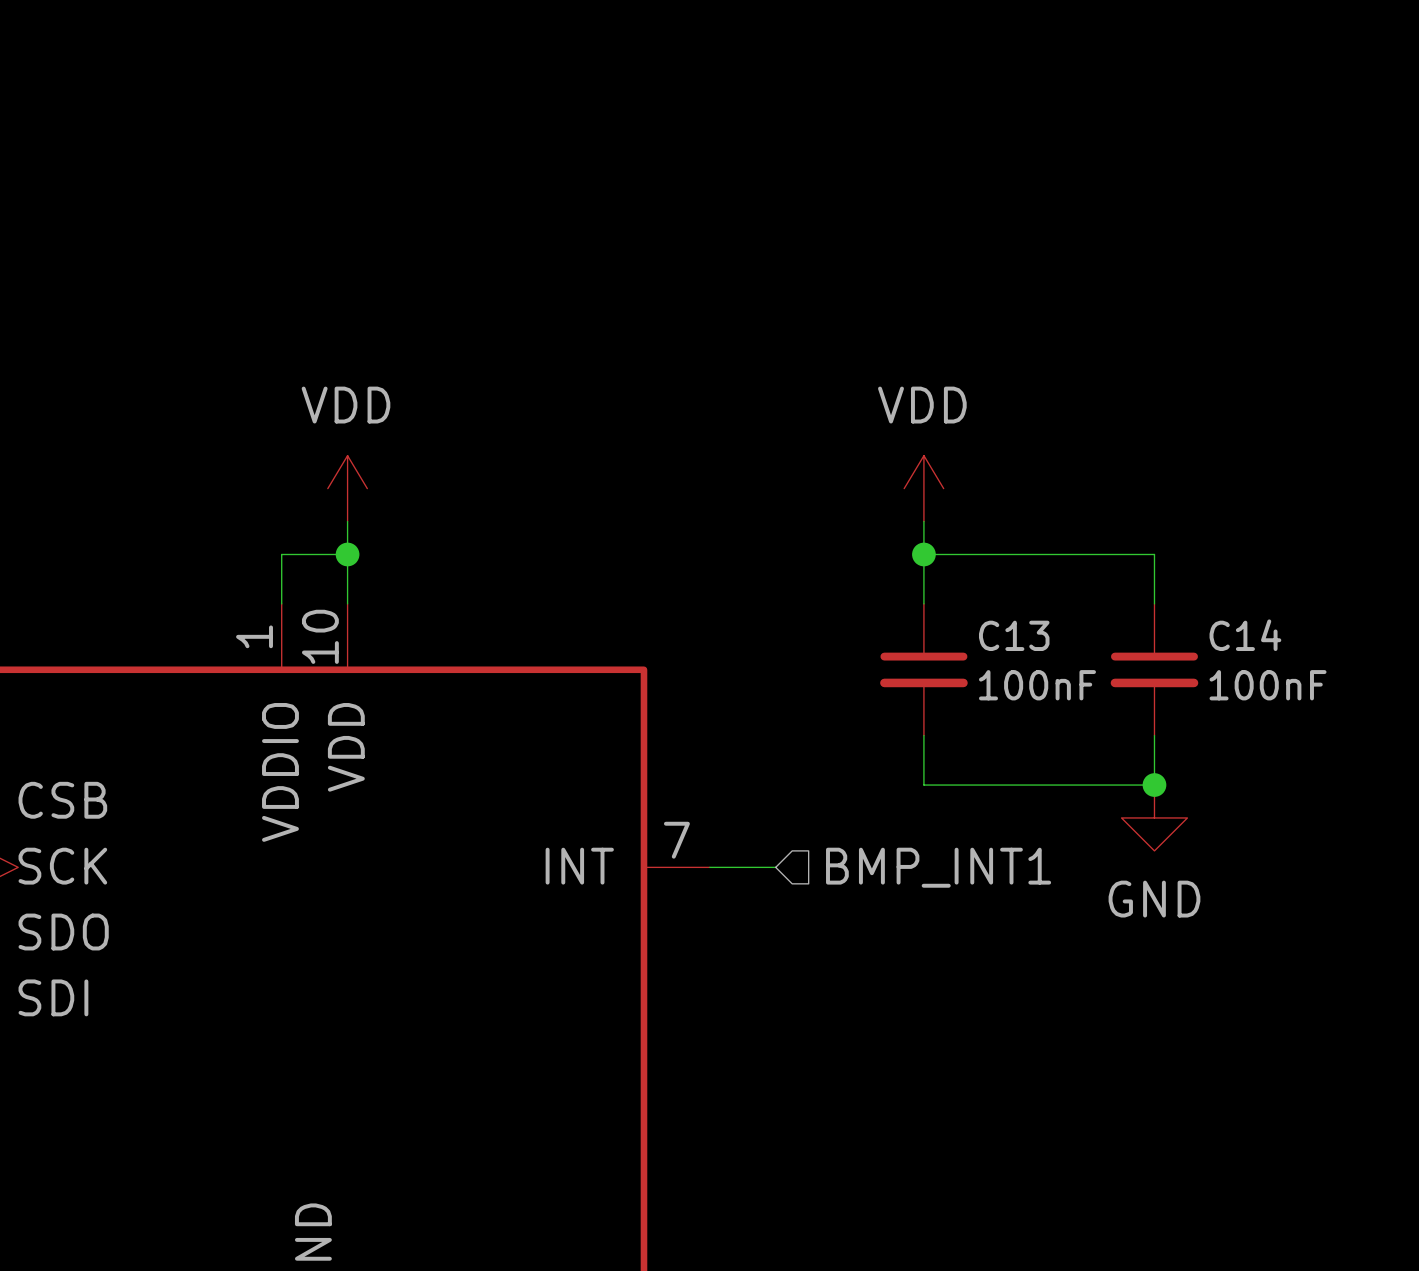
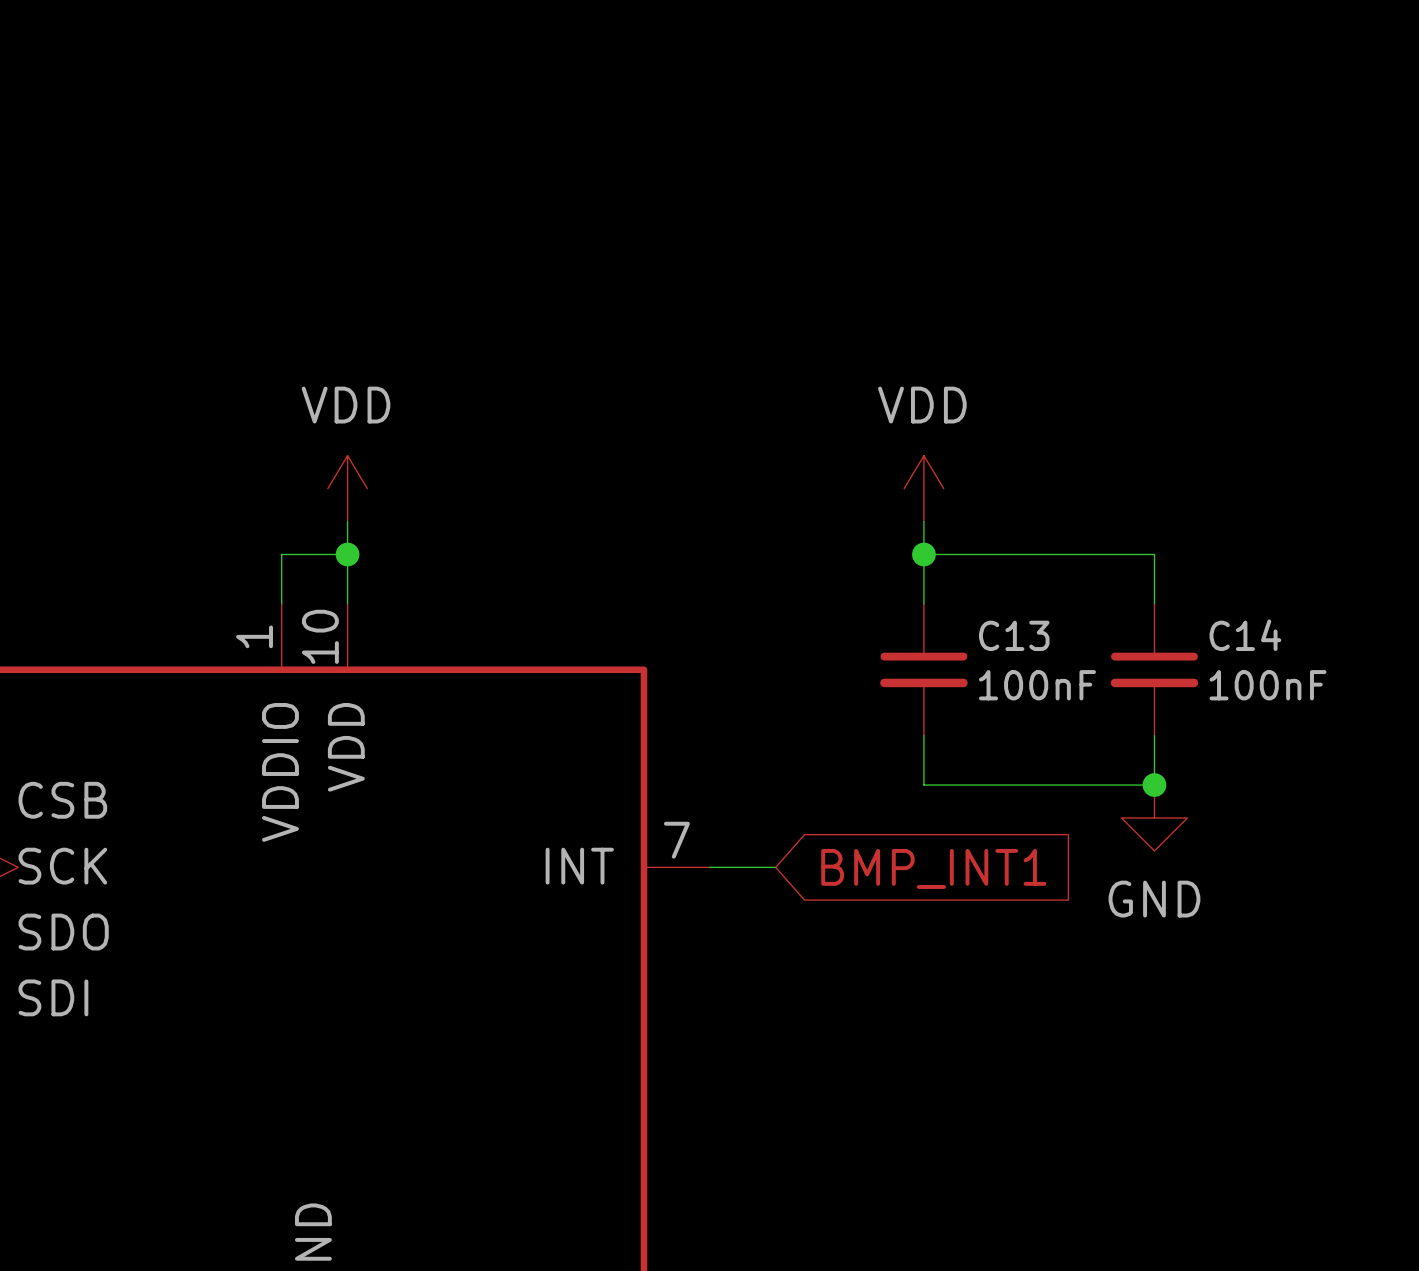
hierarchical label: BMP_INT1 (938, 867) -> none
global label: none -> BMP_INT1 (933, 868)

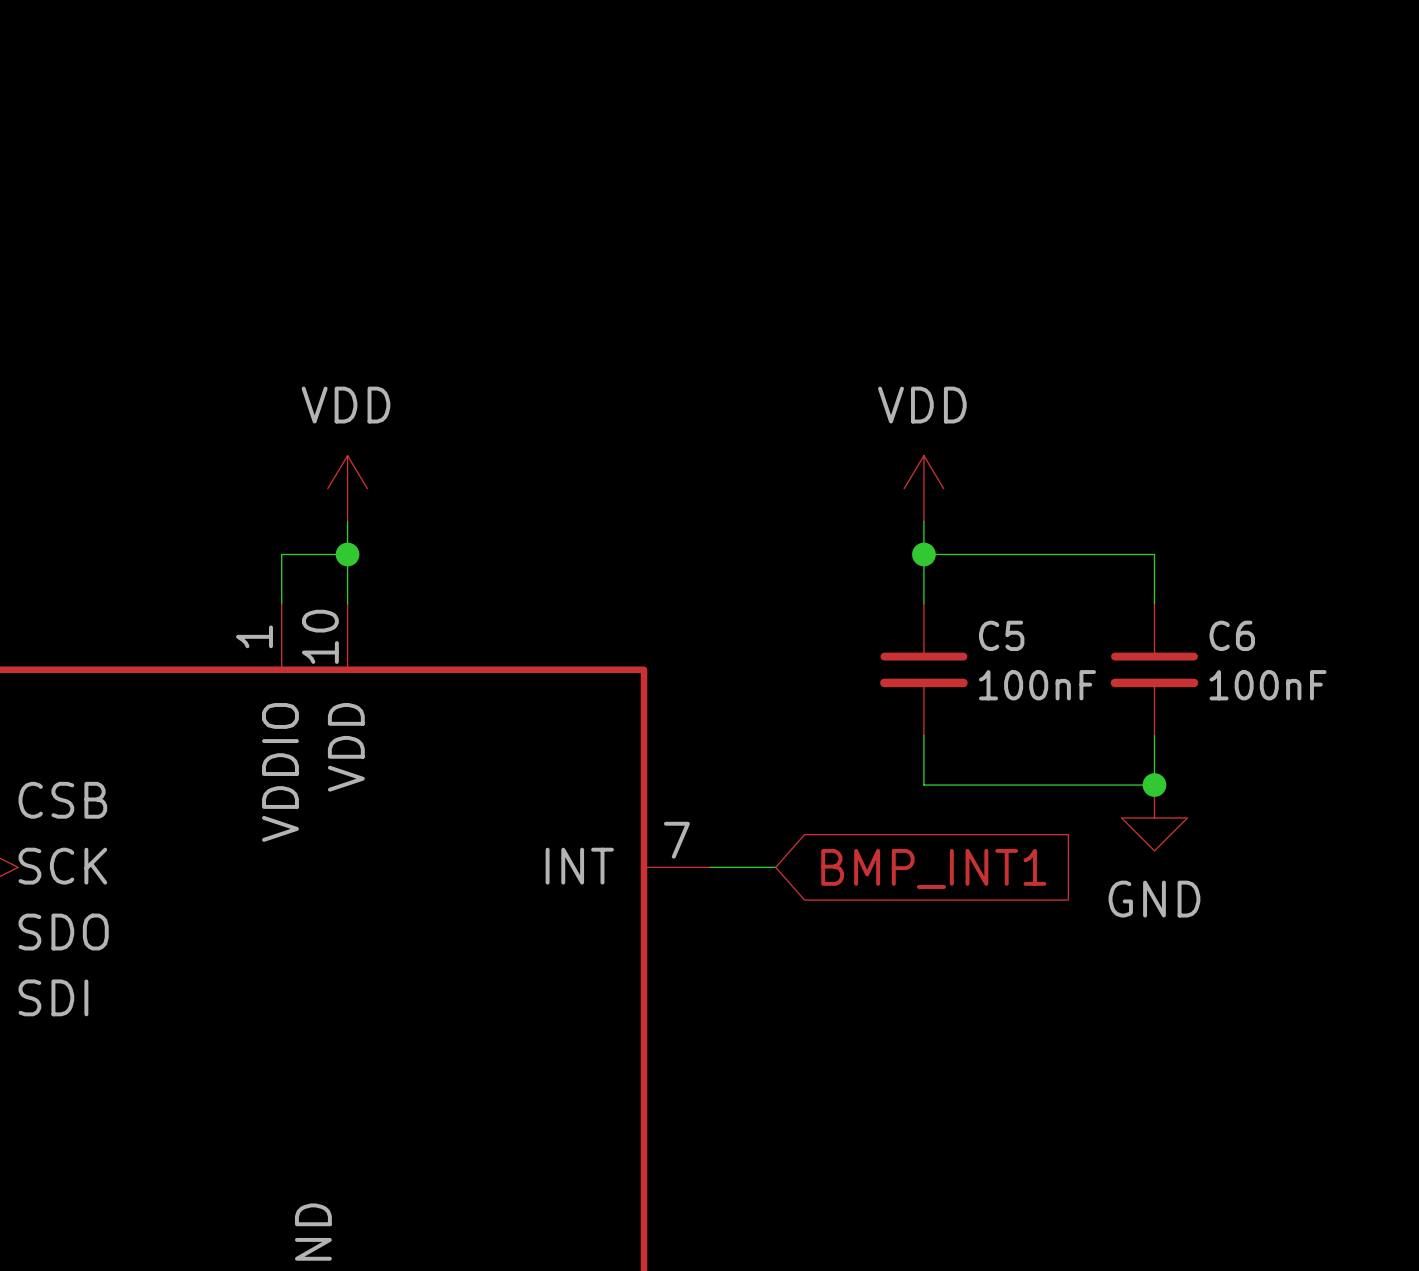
C13 name: C13 (1014, 635) -> C5 (1001, 635)
C14 name: C14 (1245, 635) -> C6 (1232, 635)

